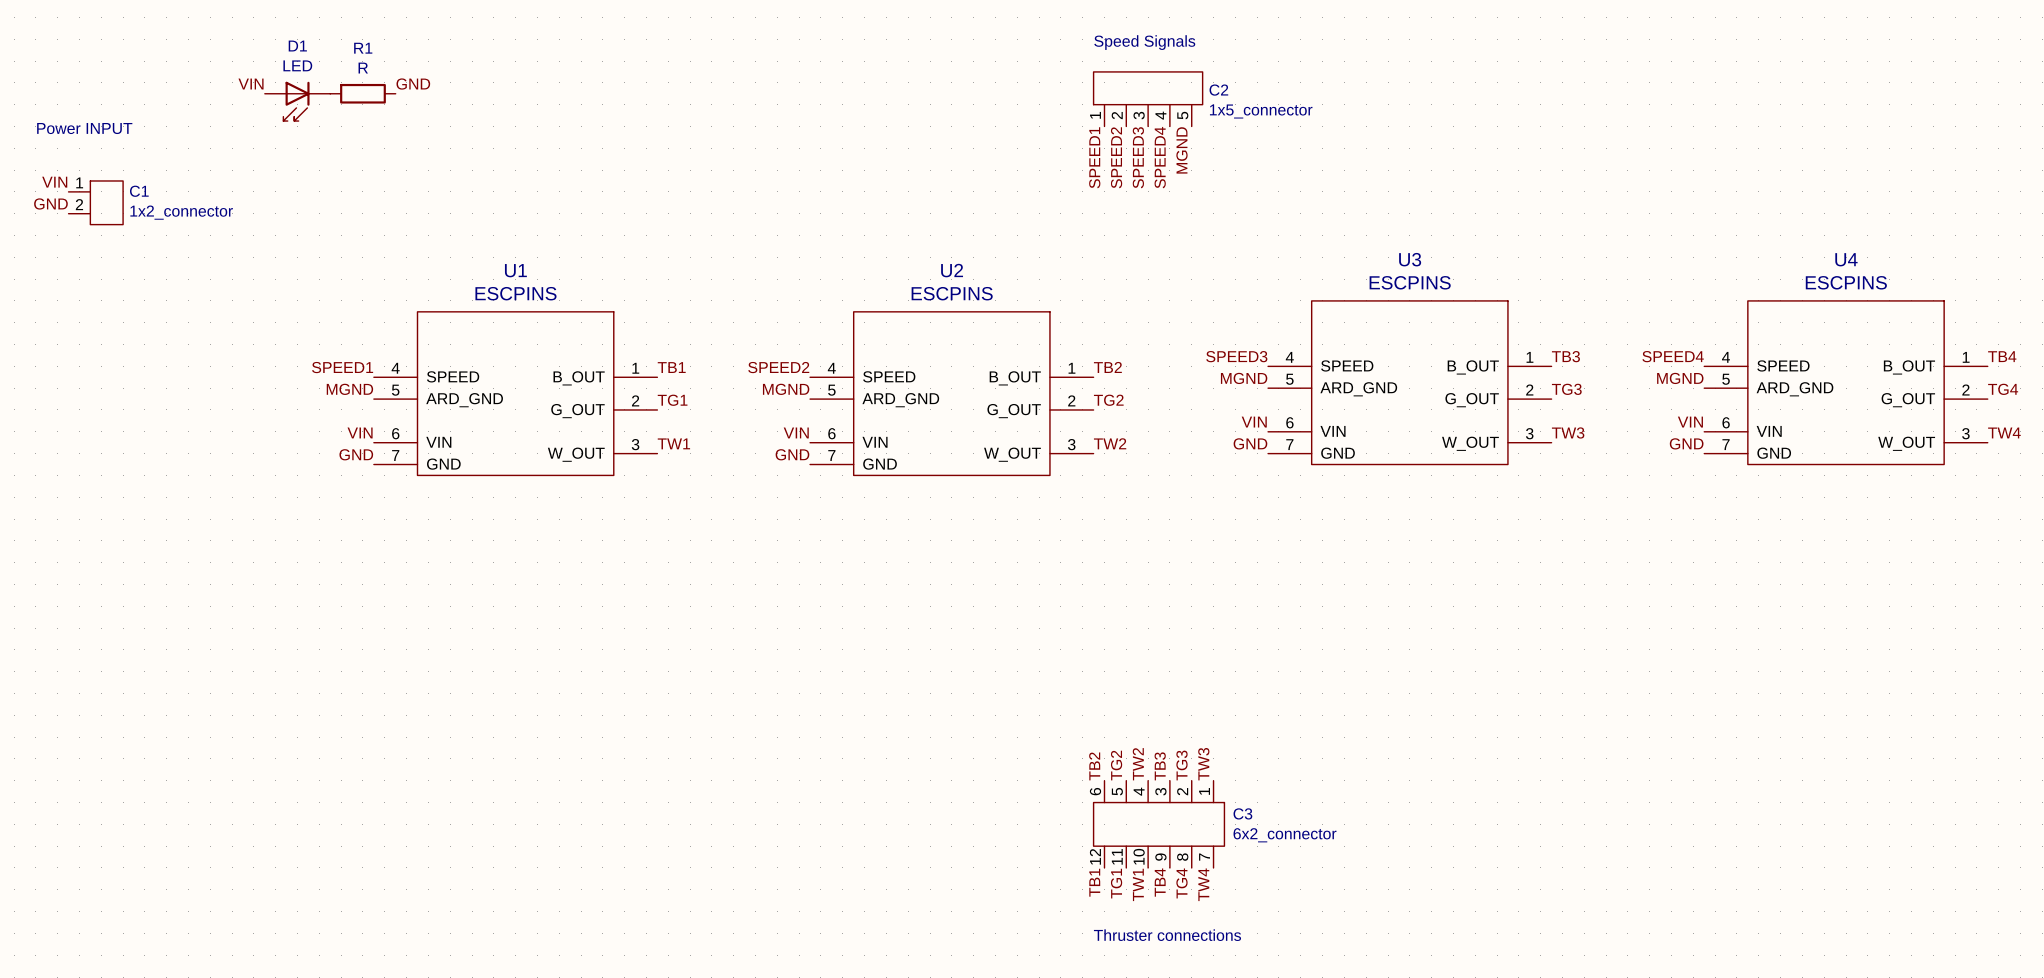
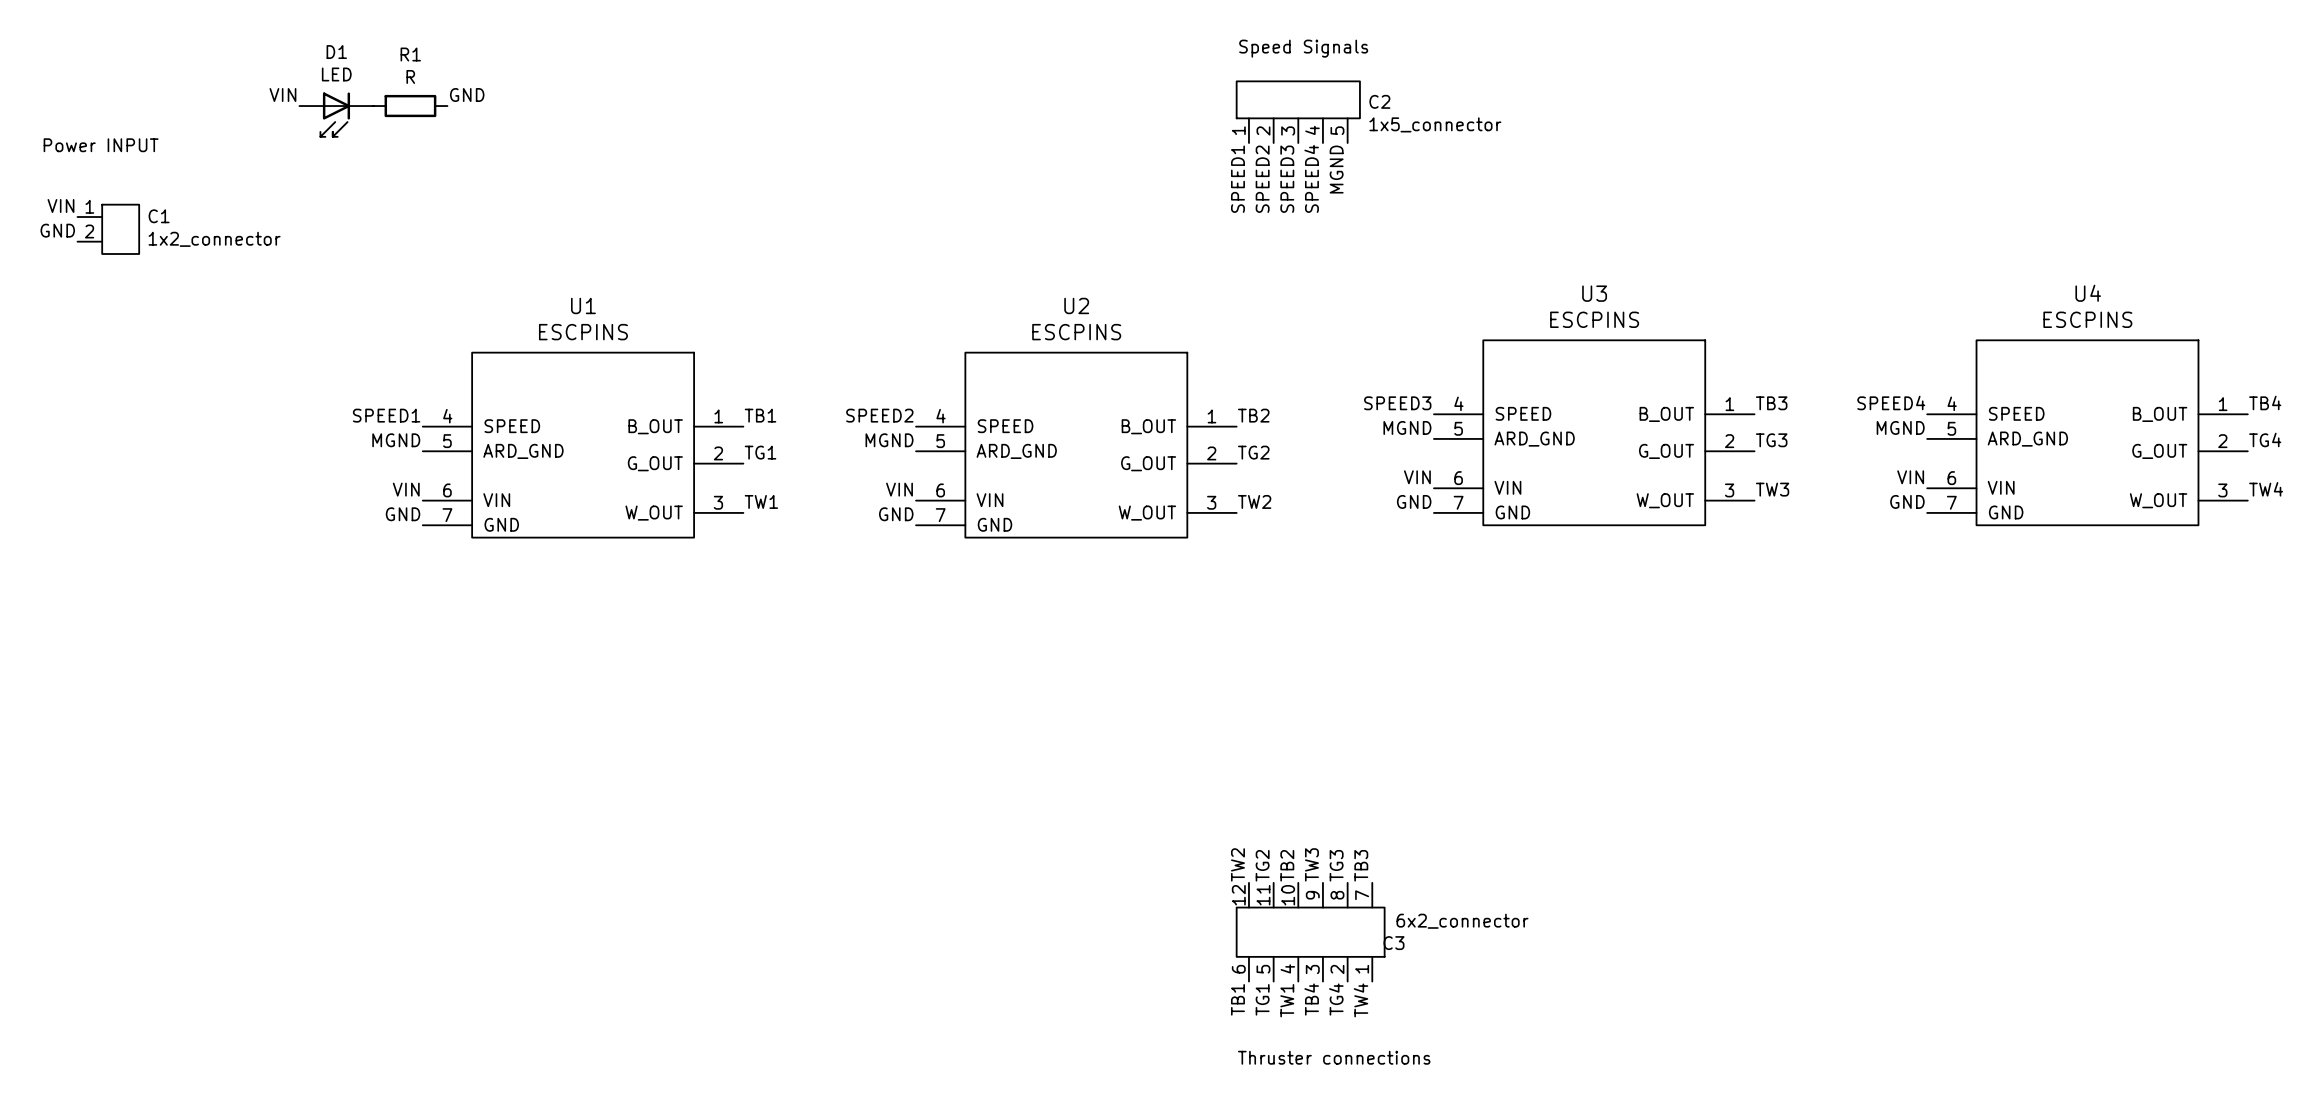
label: TW2 (1138, 764) -> TB2 (1287, 865)
label: TW3 (1203, 764) -> TB3 (1361, 865)
label: TB2 (1094, 766) -> TW2 (1237, 864)
label: TB3 (1160, 766) -> TW3 (1311, 864)
C3 flip: as is (1159, 824) -> up-down (1310, 932)

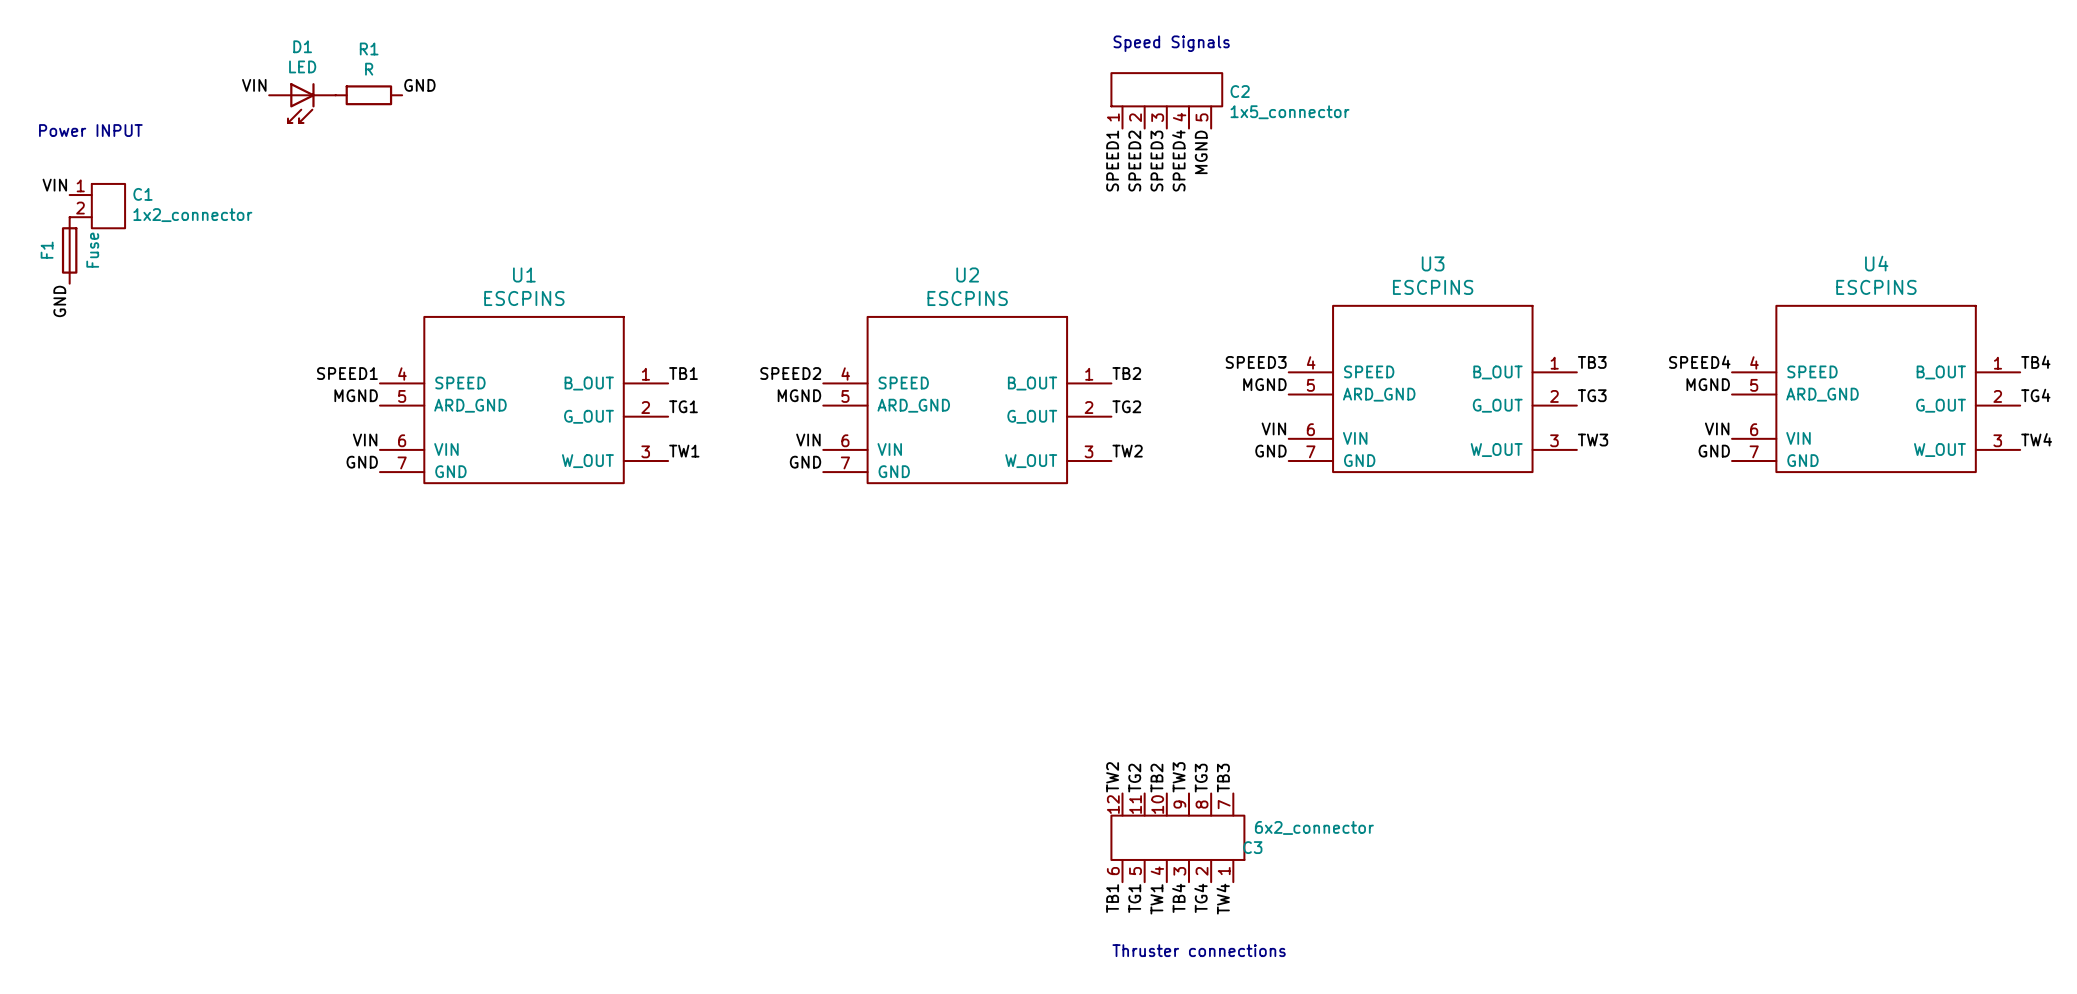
label rotation: 0° (57, 230) -> 90° counterclockwise (59, 301)
label position: GND (57, 230) -> GND (59, 301)
F1: none -> Fuse (69, 250)

